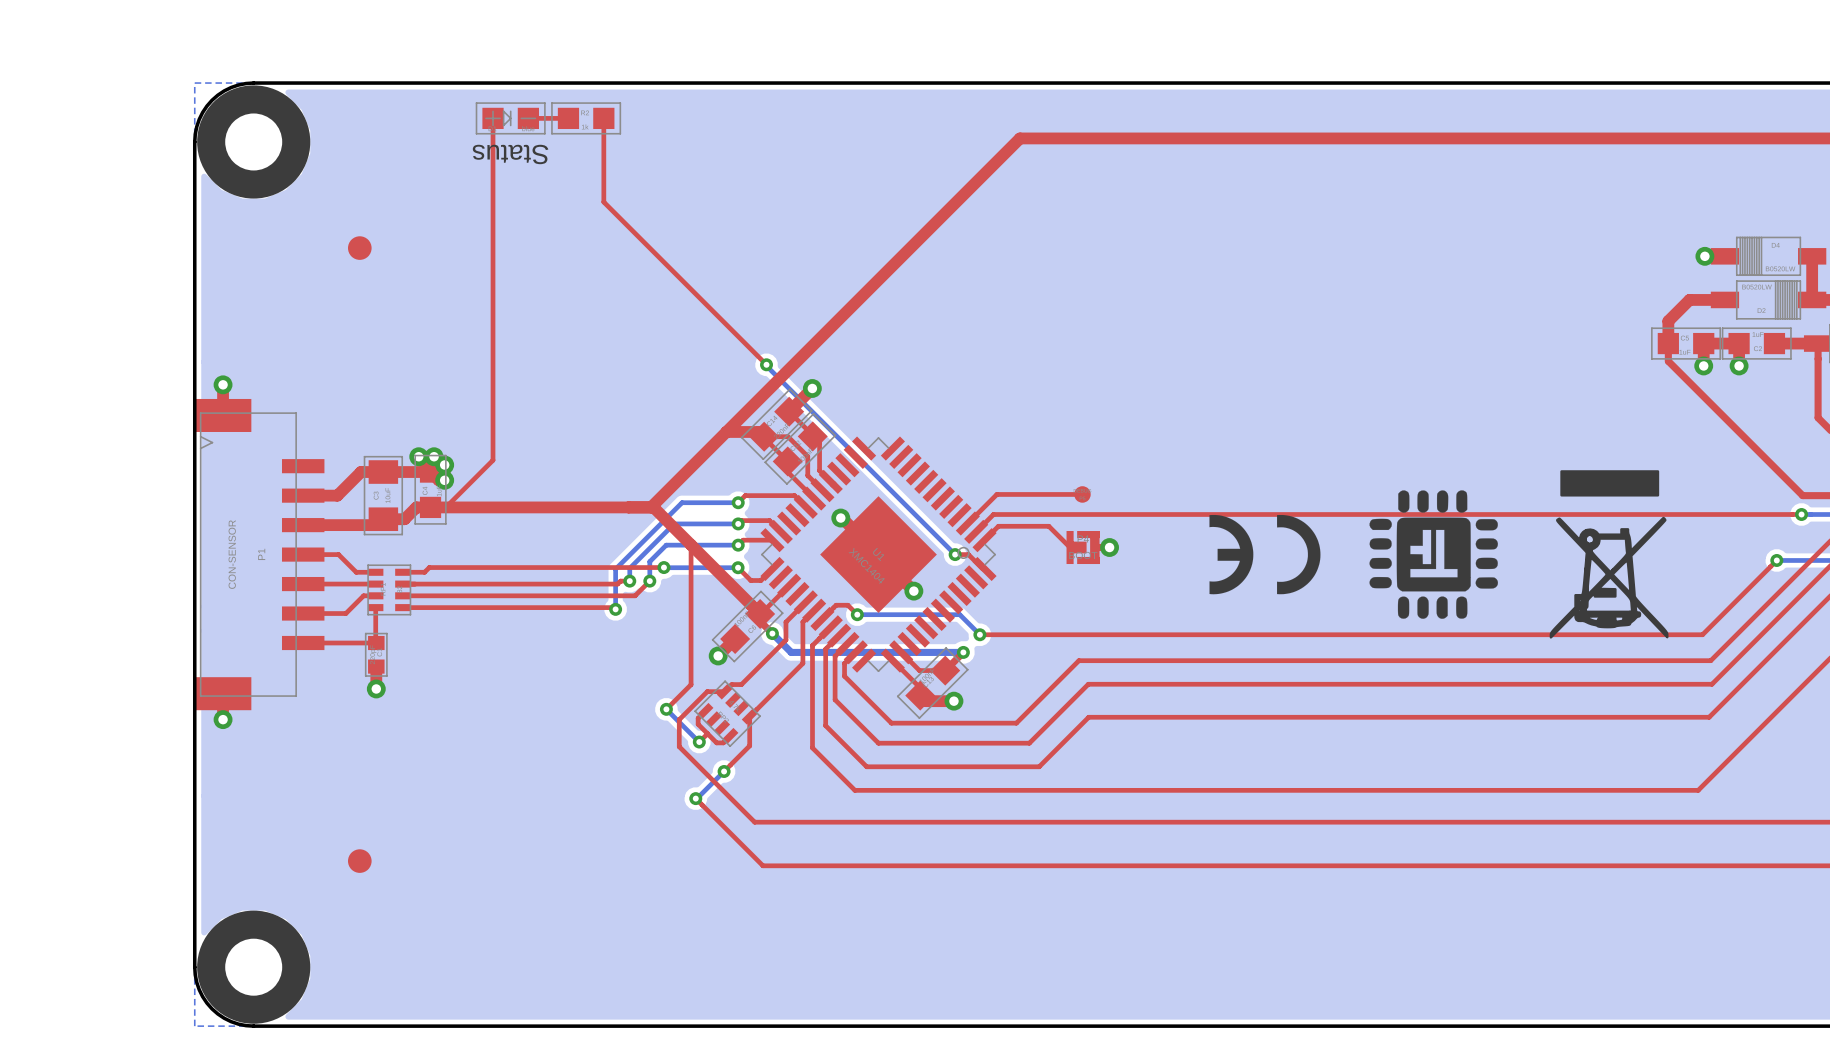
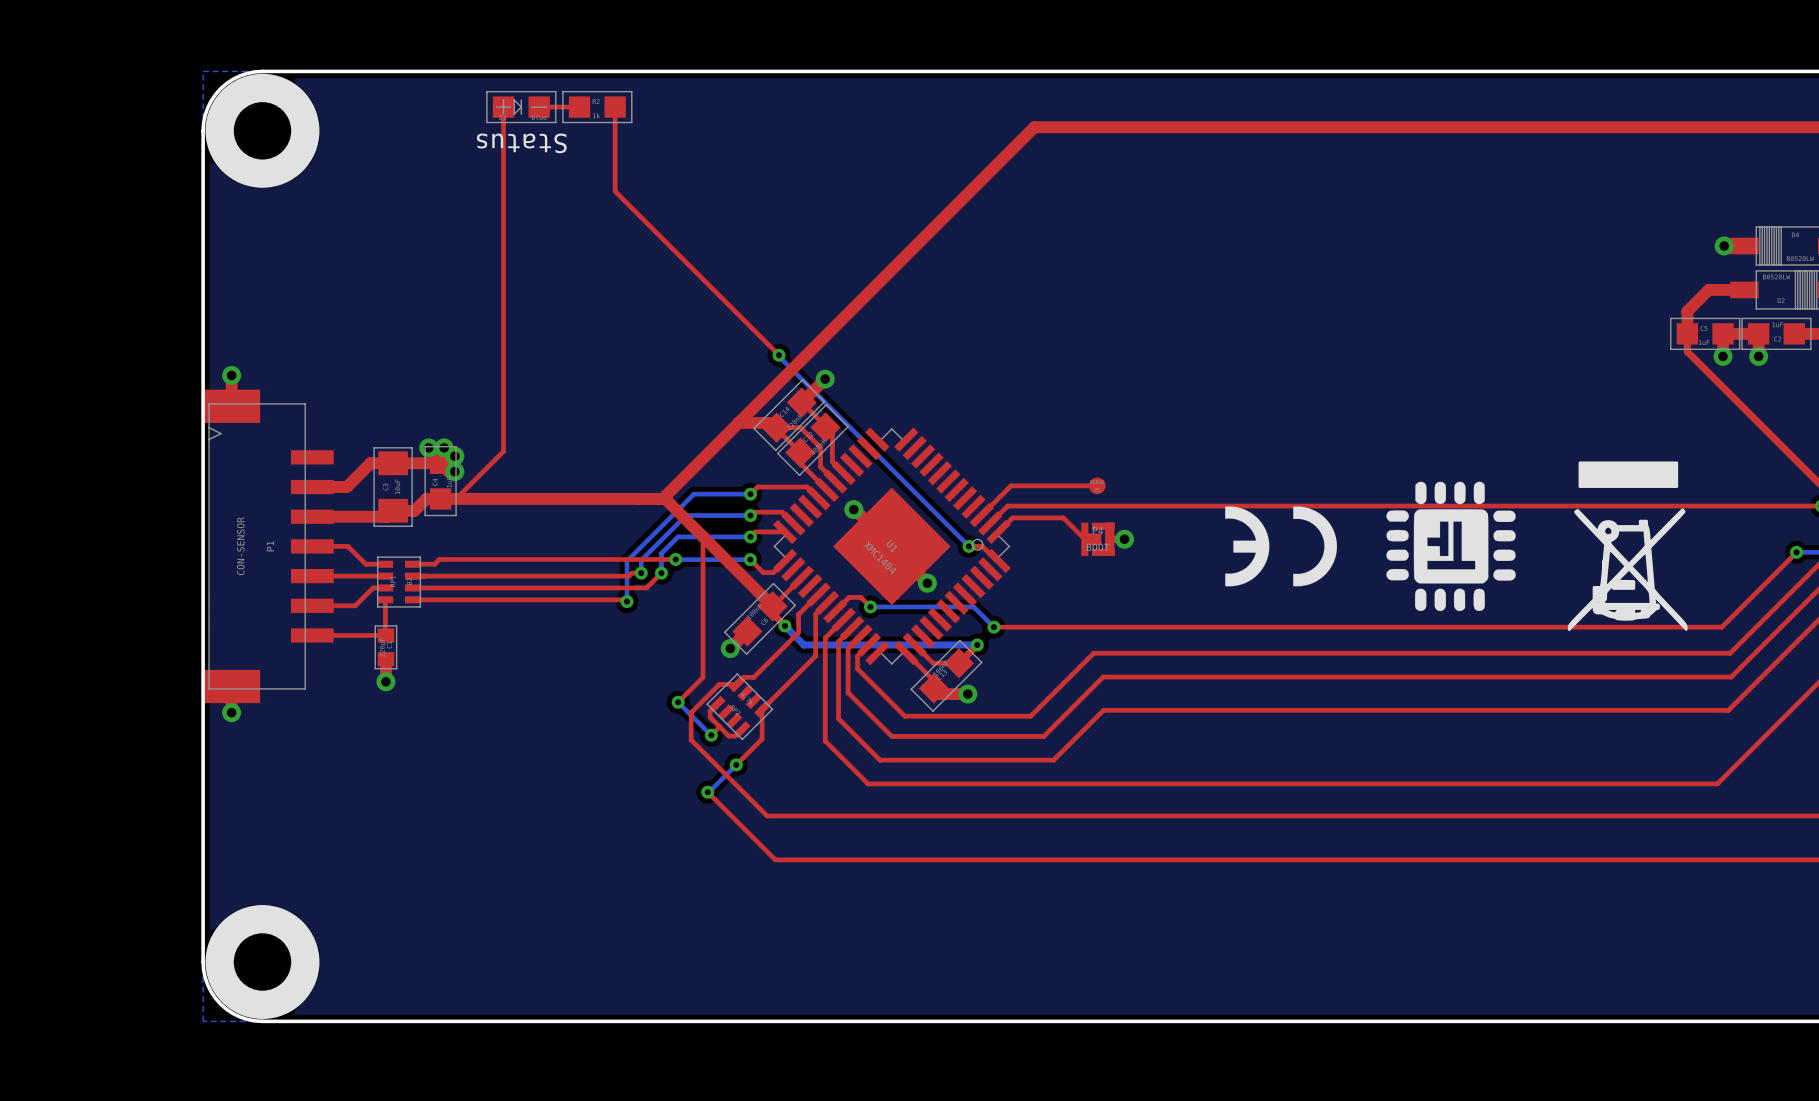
part: (359, 248) -> none
part: (359, 861) -> none

